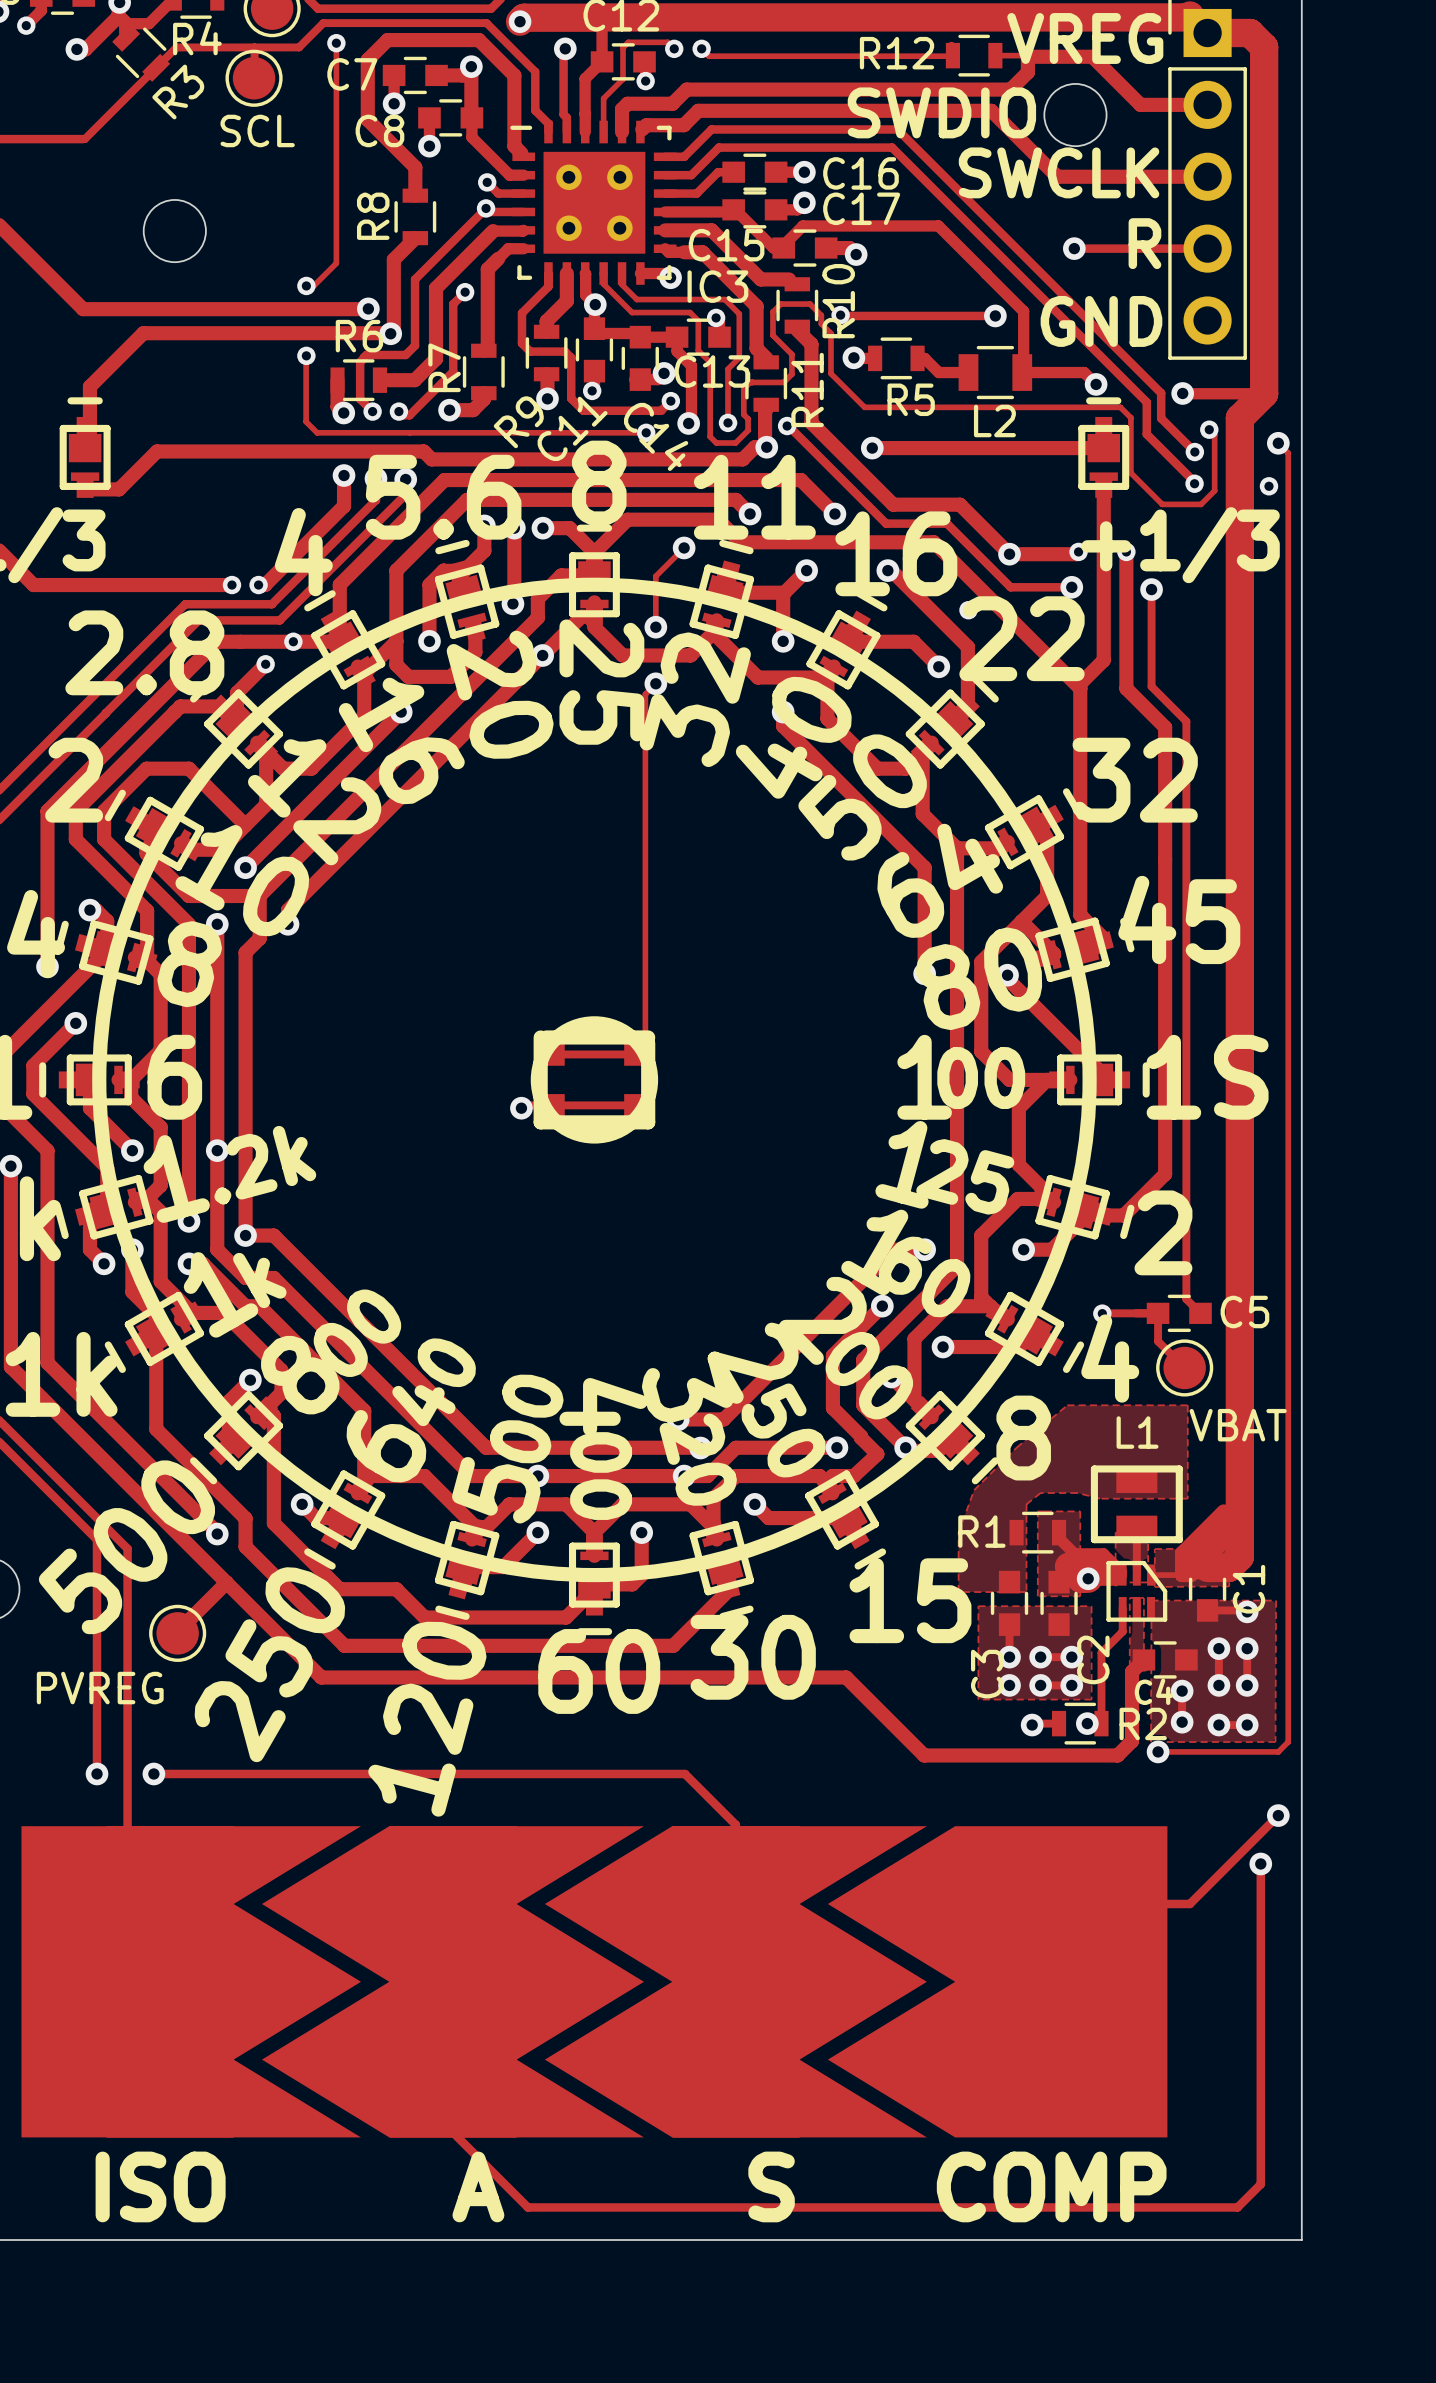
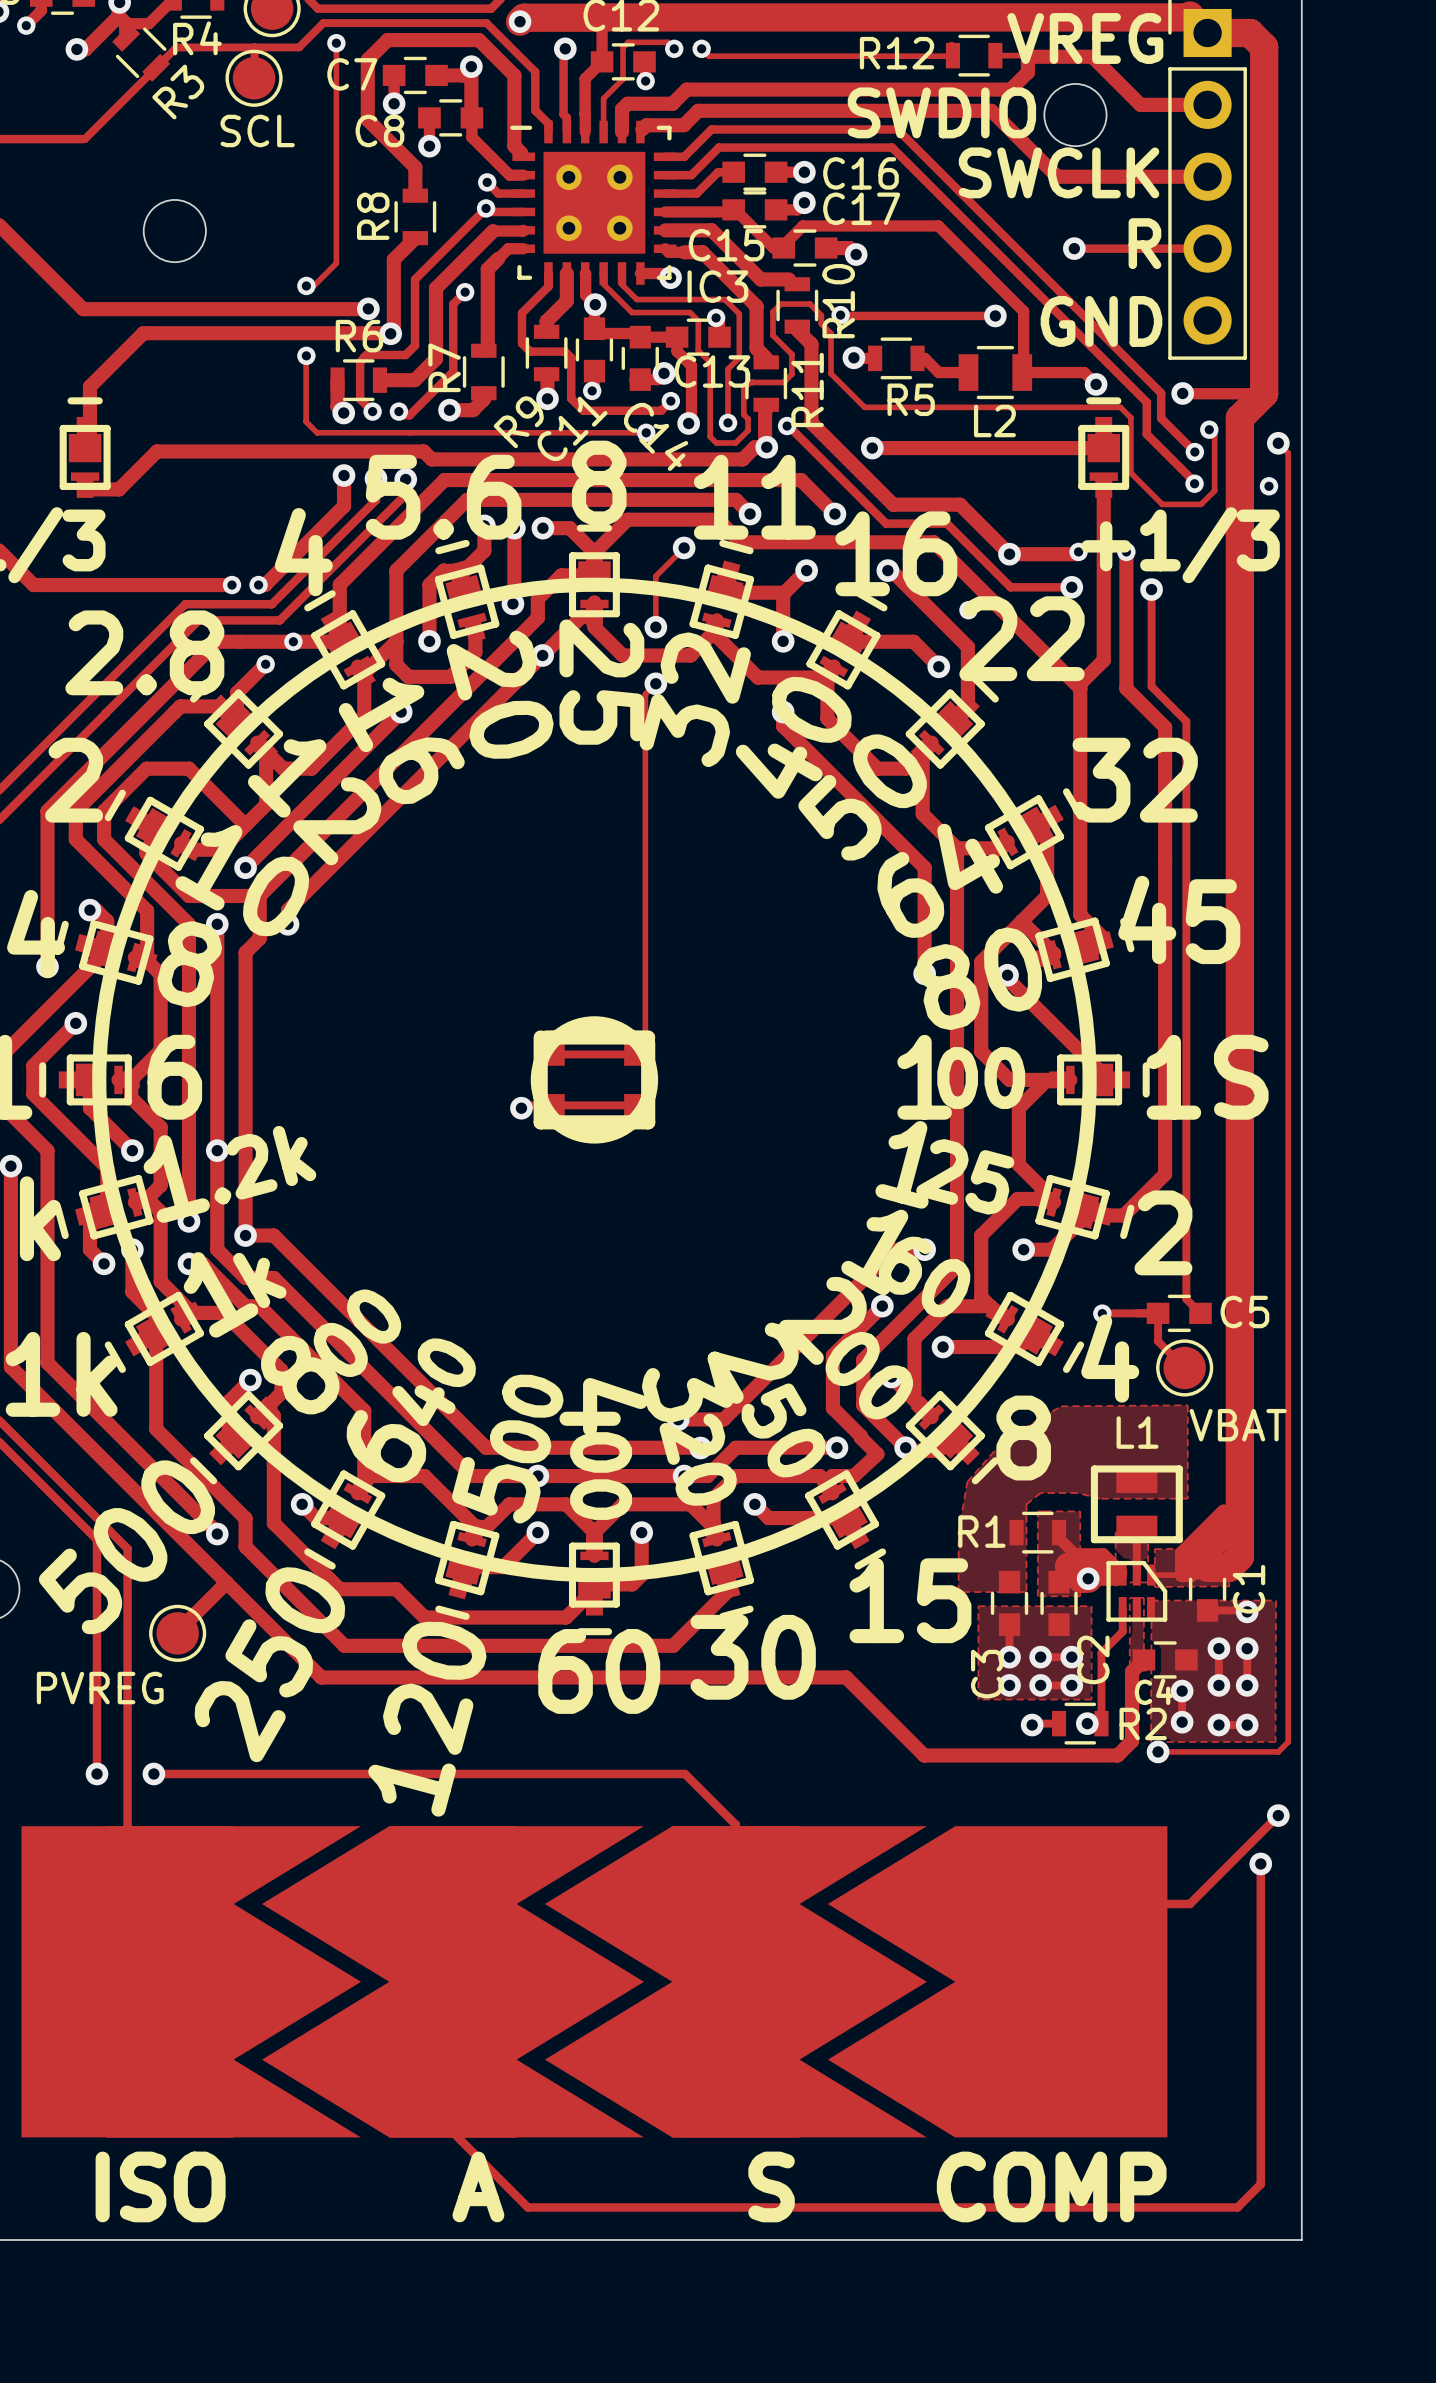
zone outline: (1187, 1405) (1067, 1405) (1016, 1447) (974, 1490) (958, 1532) -> (1187, 1405) (1061, 1406) (1003, 1440) (967, 1481) (958, 1532)

